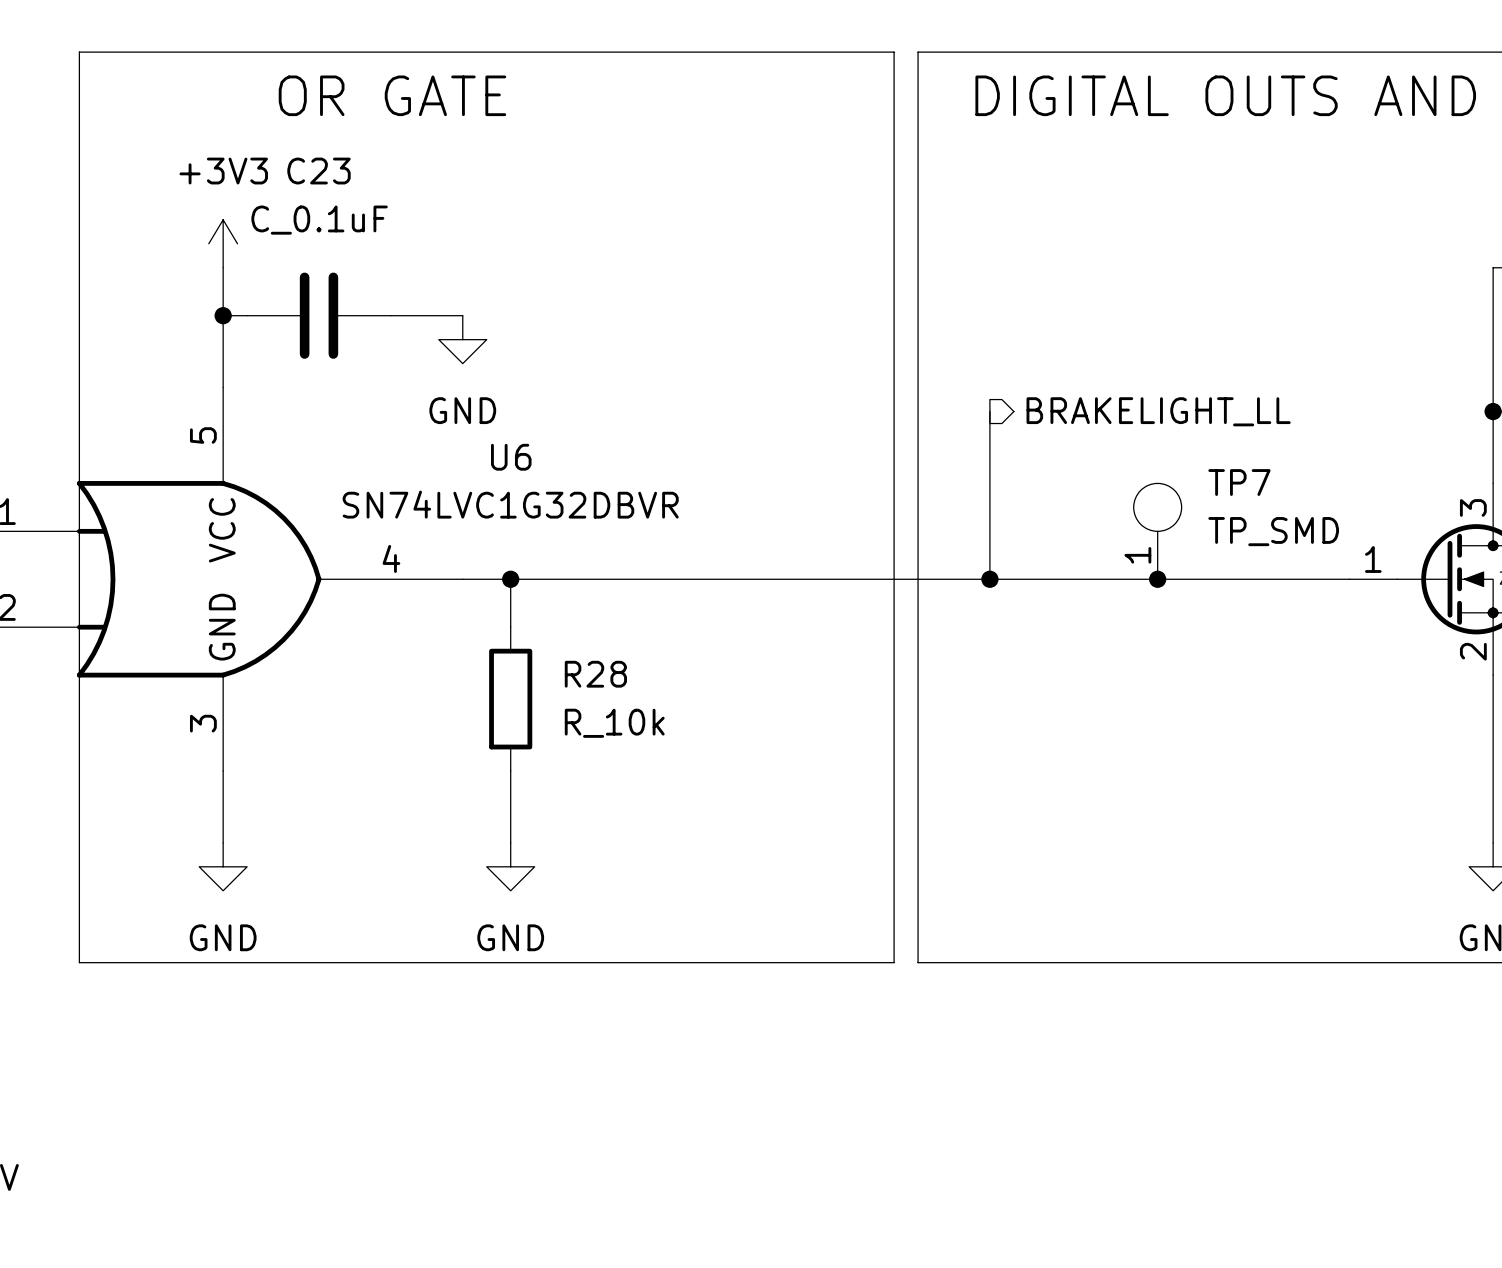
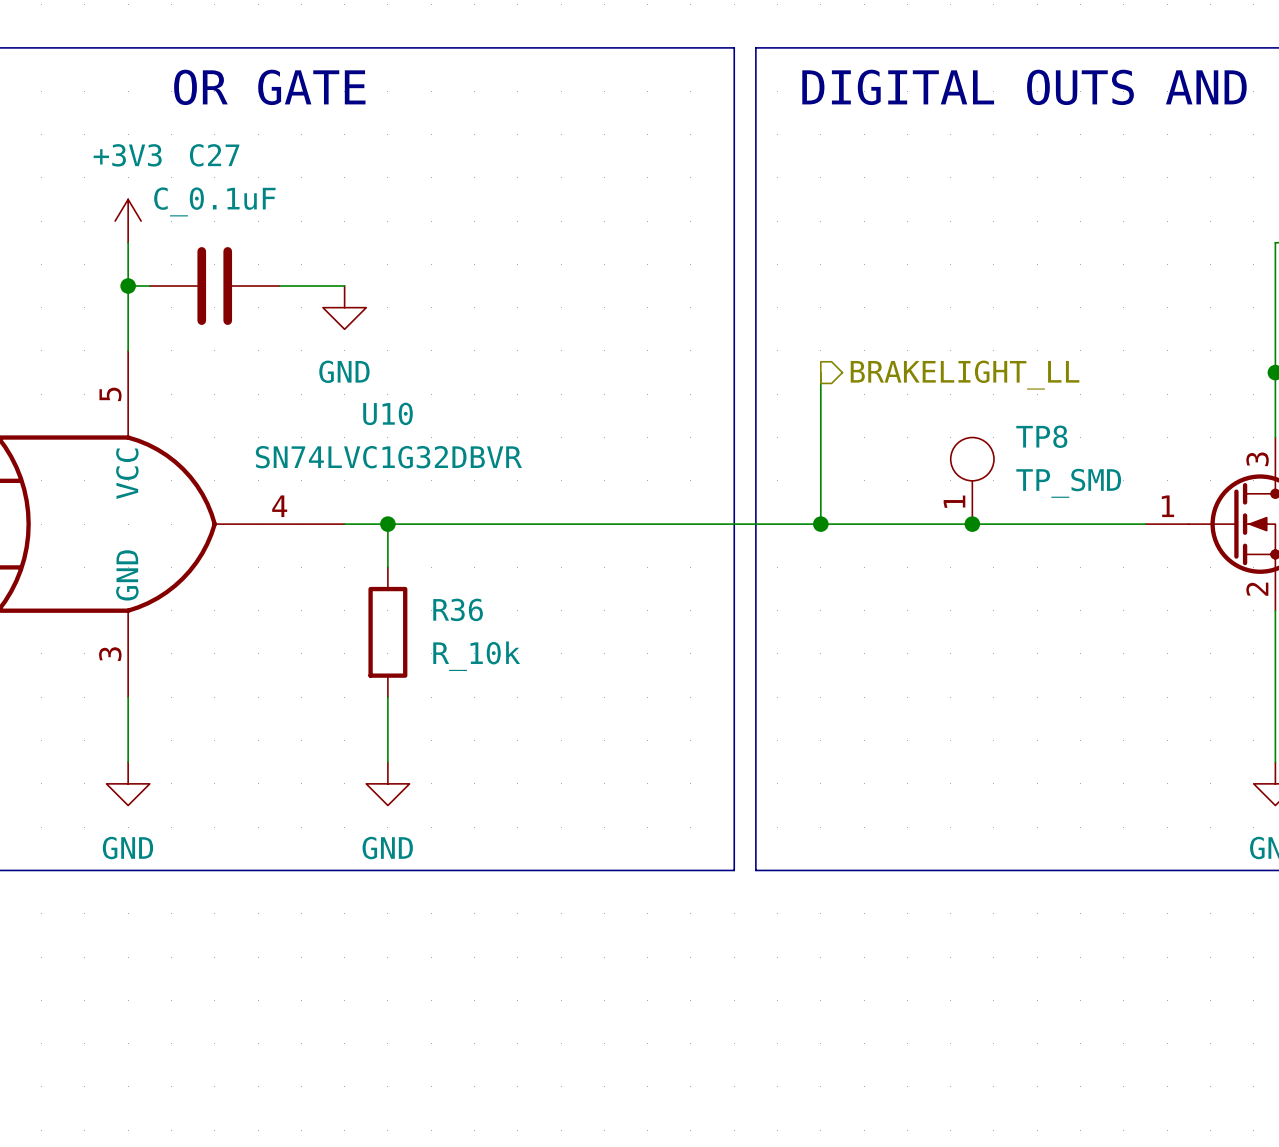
C23 name: C23 (319, 171) -> C27 (214, 155)
U6 name: U6 (511, 457) -> U10 (388, 413)
TP7 name: TP7 (1239, 482) -> TP8 (1041, 436)
R28 name: R28 (595, 674) -> R36 (458, 609)

